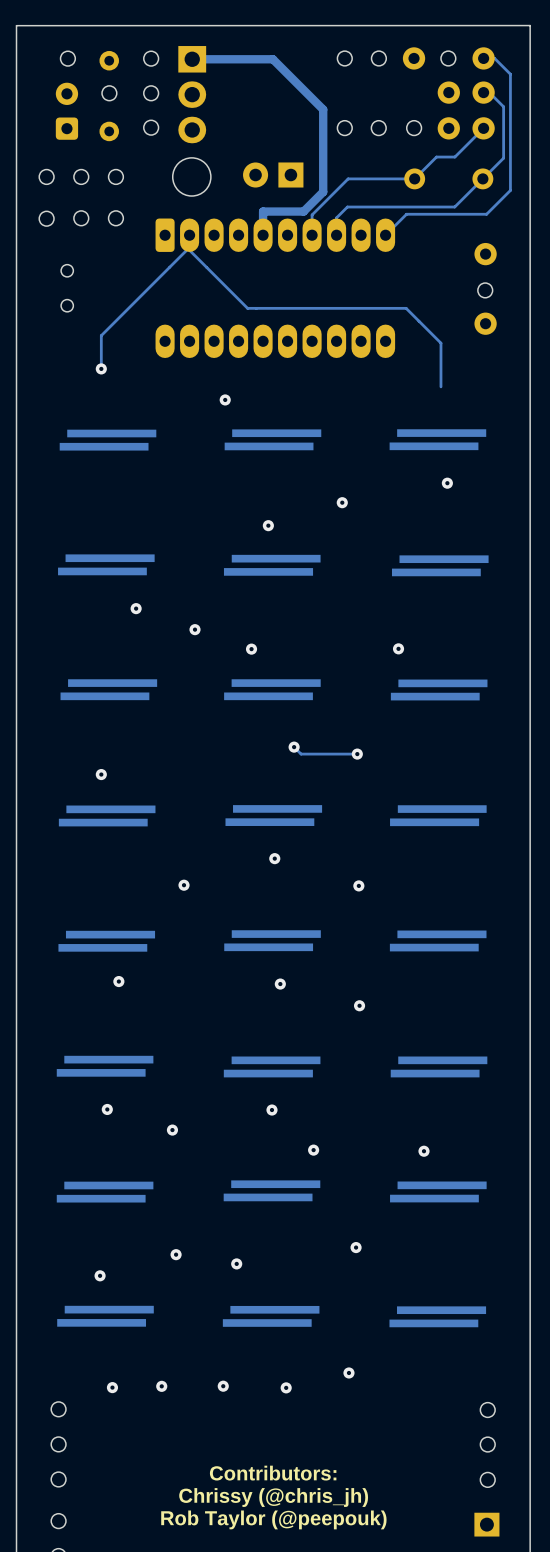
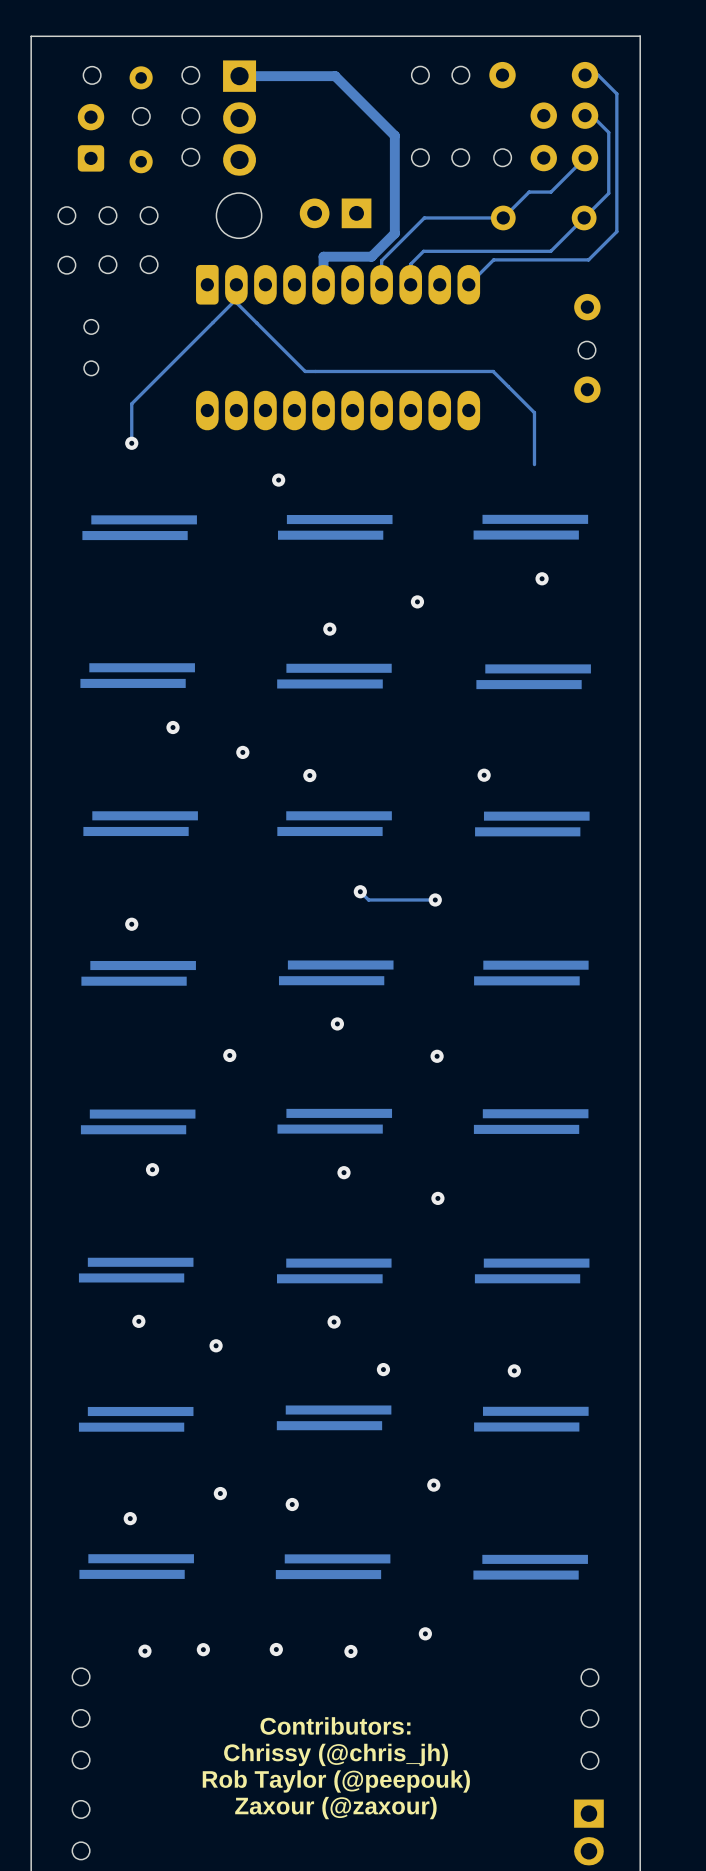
round board edge: [440, 50, 457, 67] -> none
text: none -> Contributors: (335, 1725)
text: Contributors: (273, 1473) -> Chrissy (@chris_jh) (336, 1754)
text: Chrissy (@chris_jh) (273, 1497) -> Rob Taylor (@peepouk) (336, 1781)
text: Rob Taylor (@peepouk) (273, 1519) -> Zaxour (@zaxour) (335, 1808)

